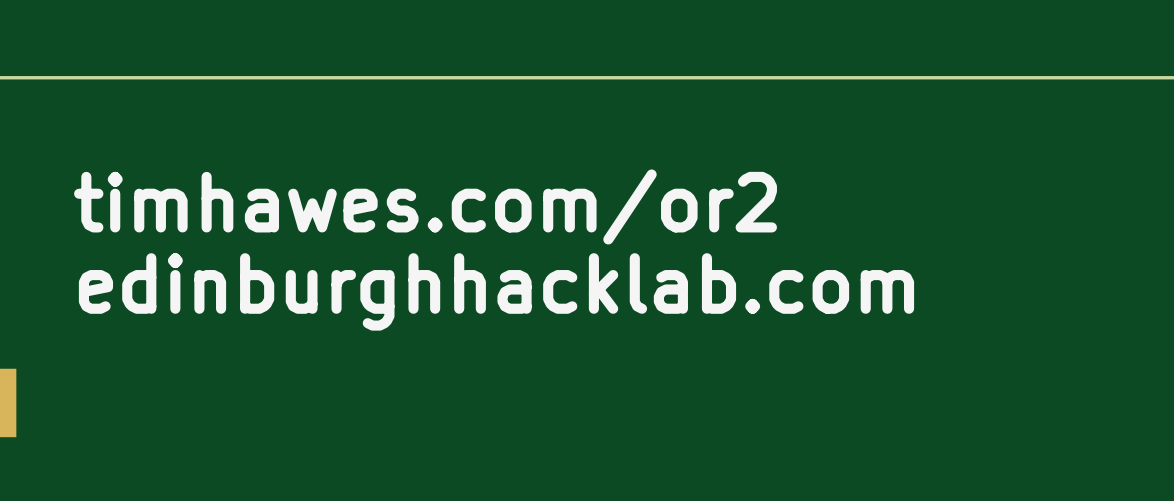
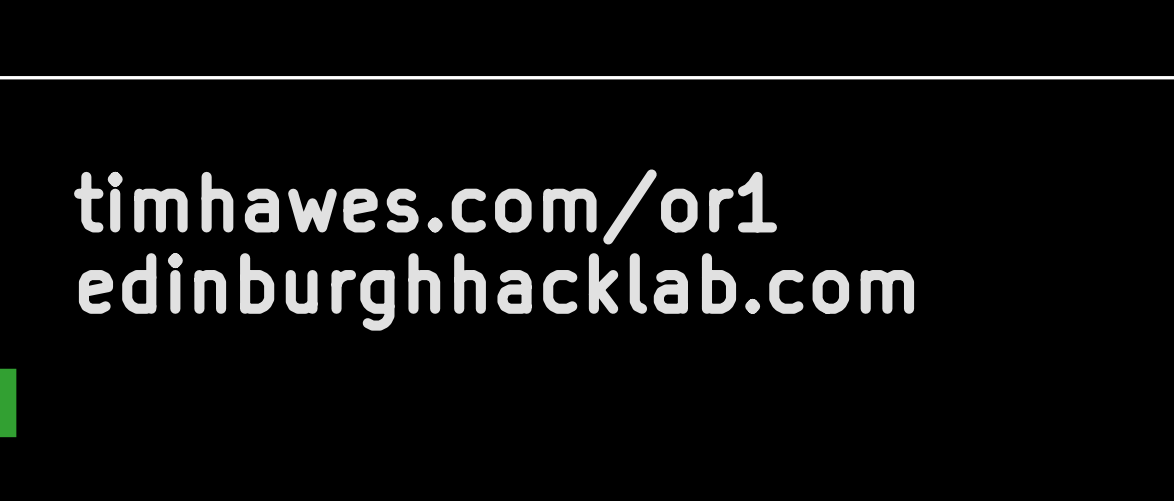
text: timhawes.com/or2 (425, 206) -> timhawes.com/or1 (425, 206)

